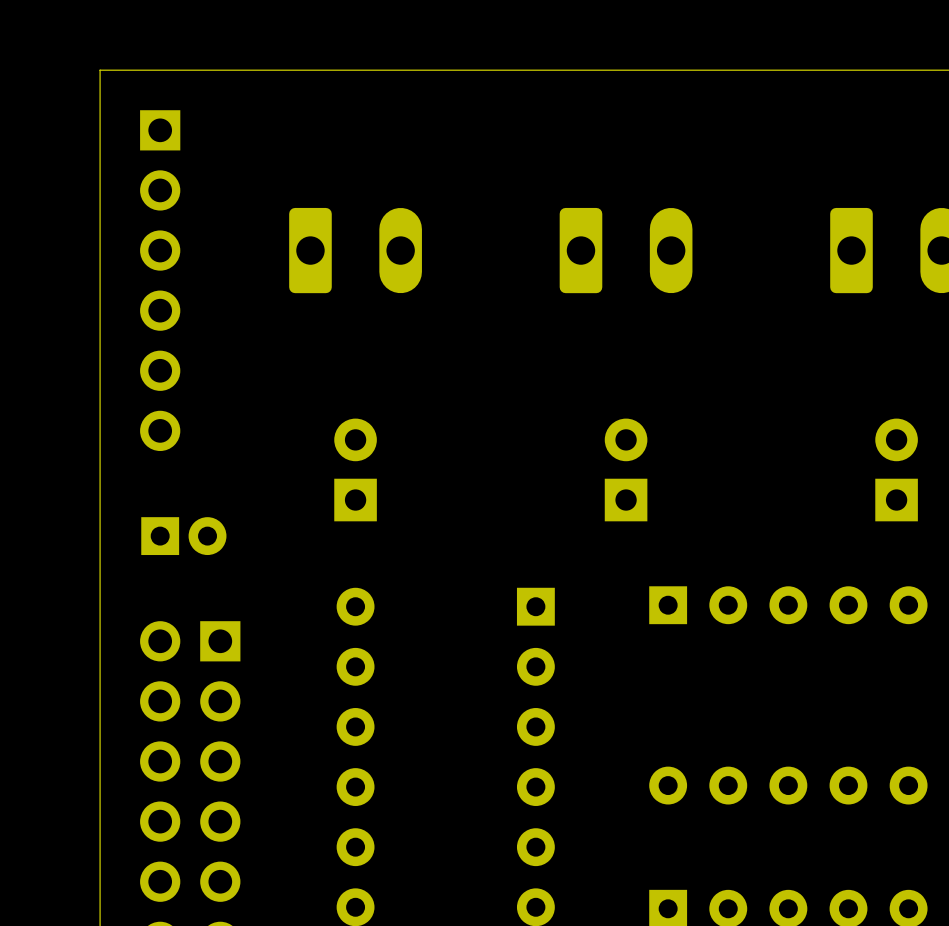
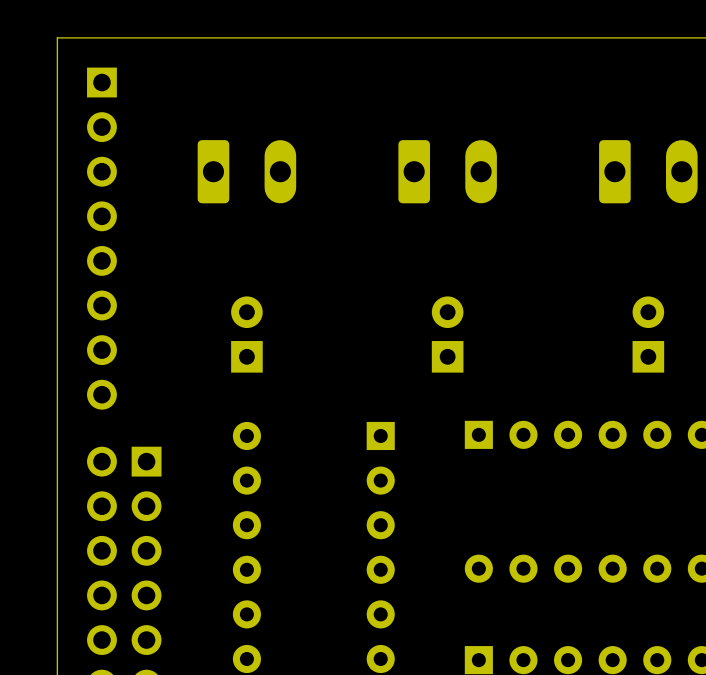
part: none -> (101, 238)
part: (183, 536) -> none

